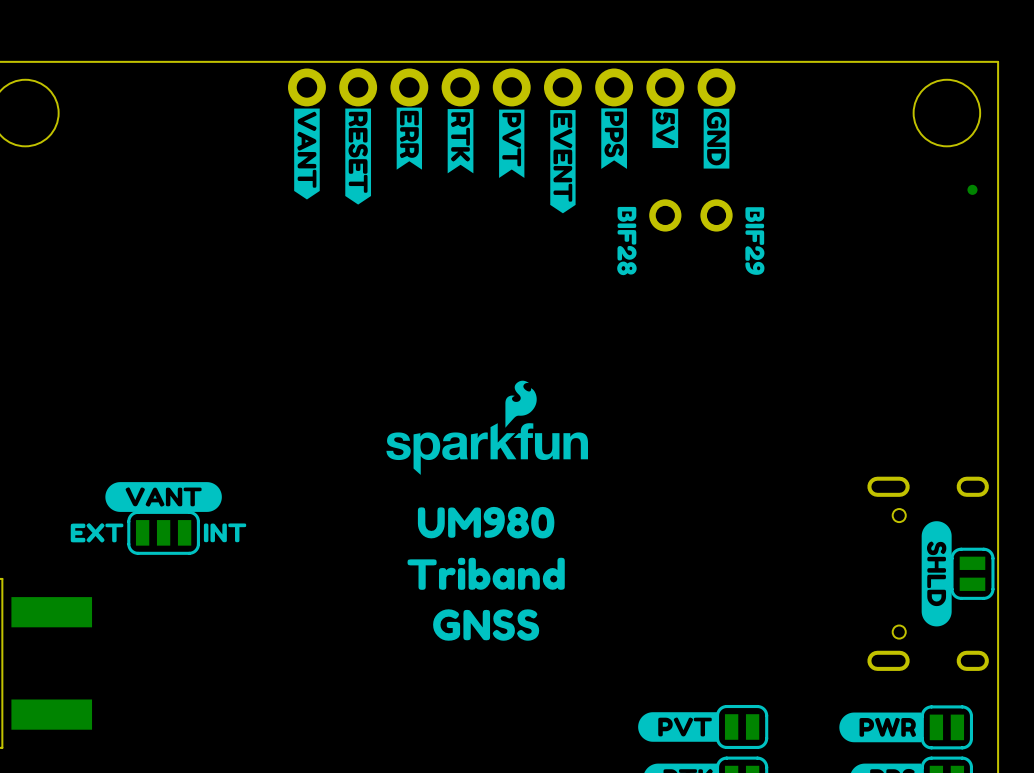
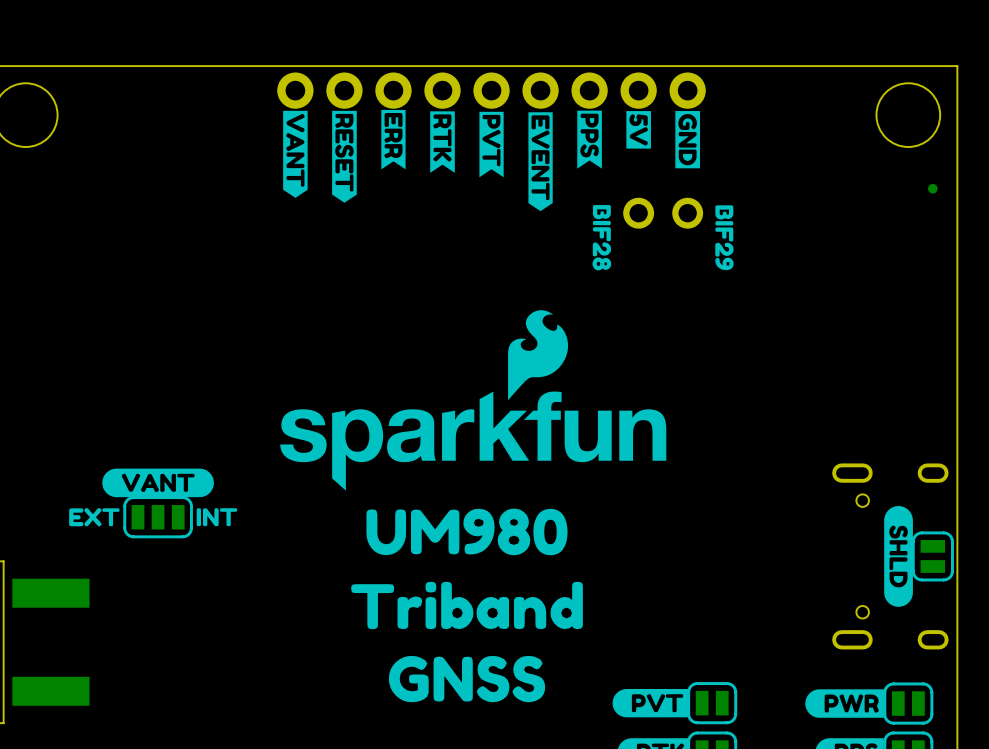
drawing shape: [386, 380, 589, 475] -> [280, 310, 667, 491]
drawing: [407, 506, 565, 590] -> none
drawing: none -> [366, 508, 568, 556]
drawing shape: [433, 609, 540, 641] -> [351, 581, 583, 630]
drawing: none -> [388, 655, 546, 703]

